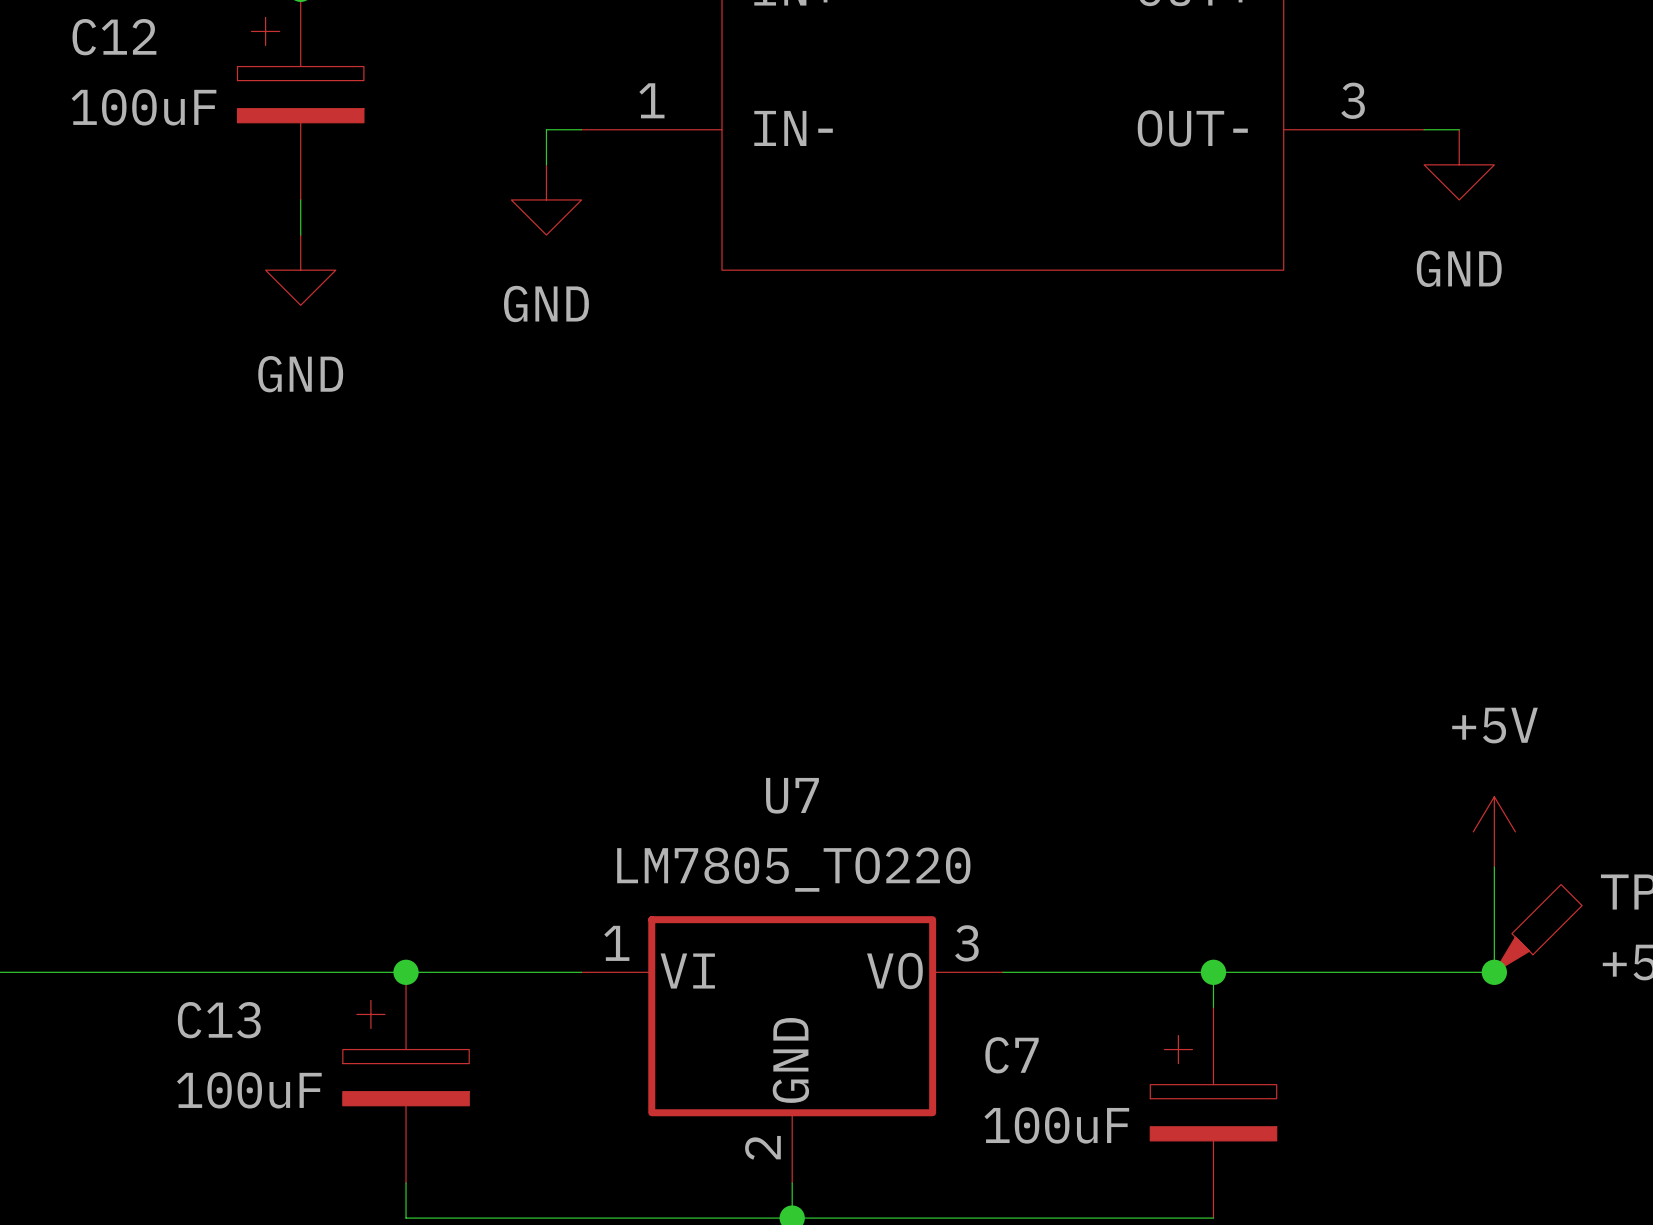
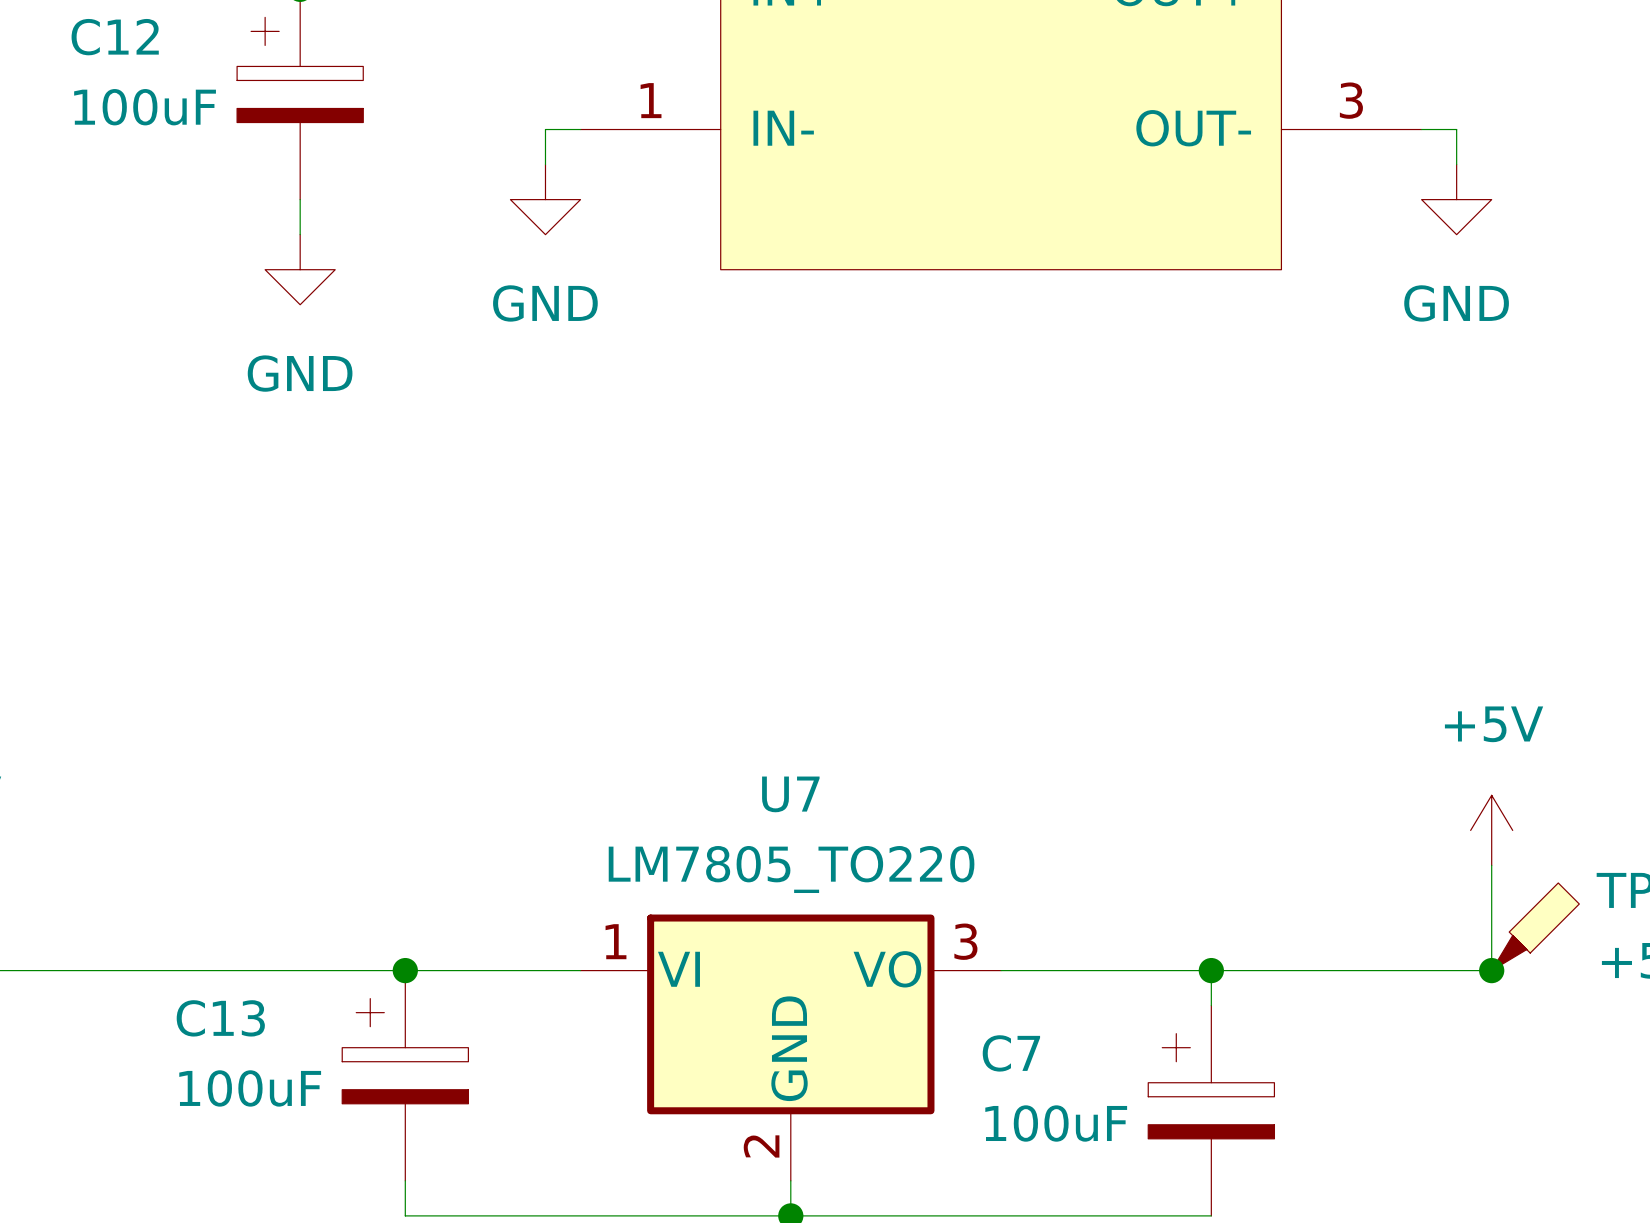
power symbol position: GND (1459, 164) -> GND (1456, 199)

